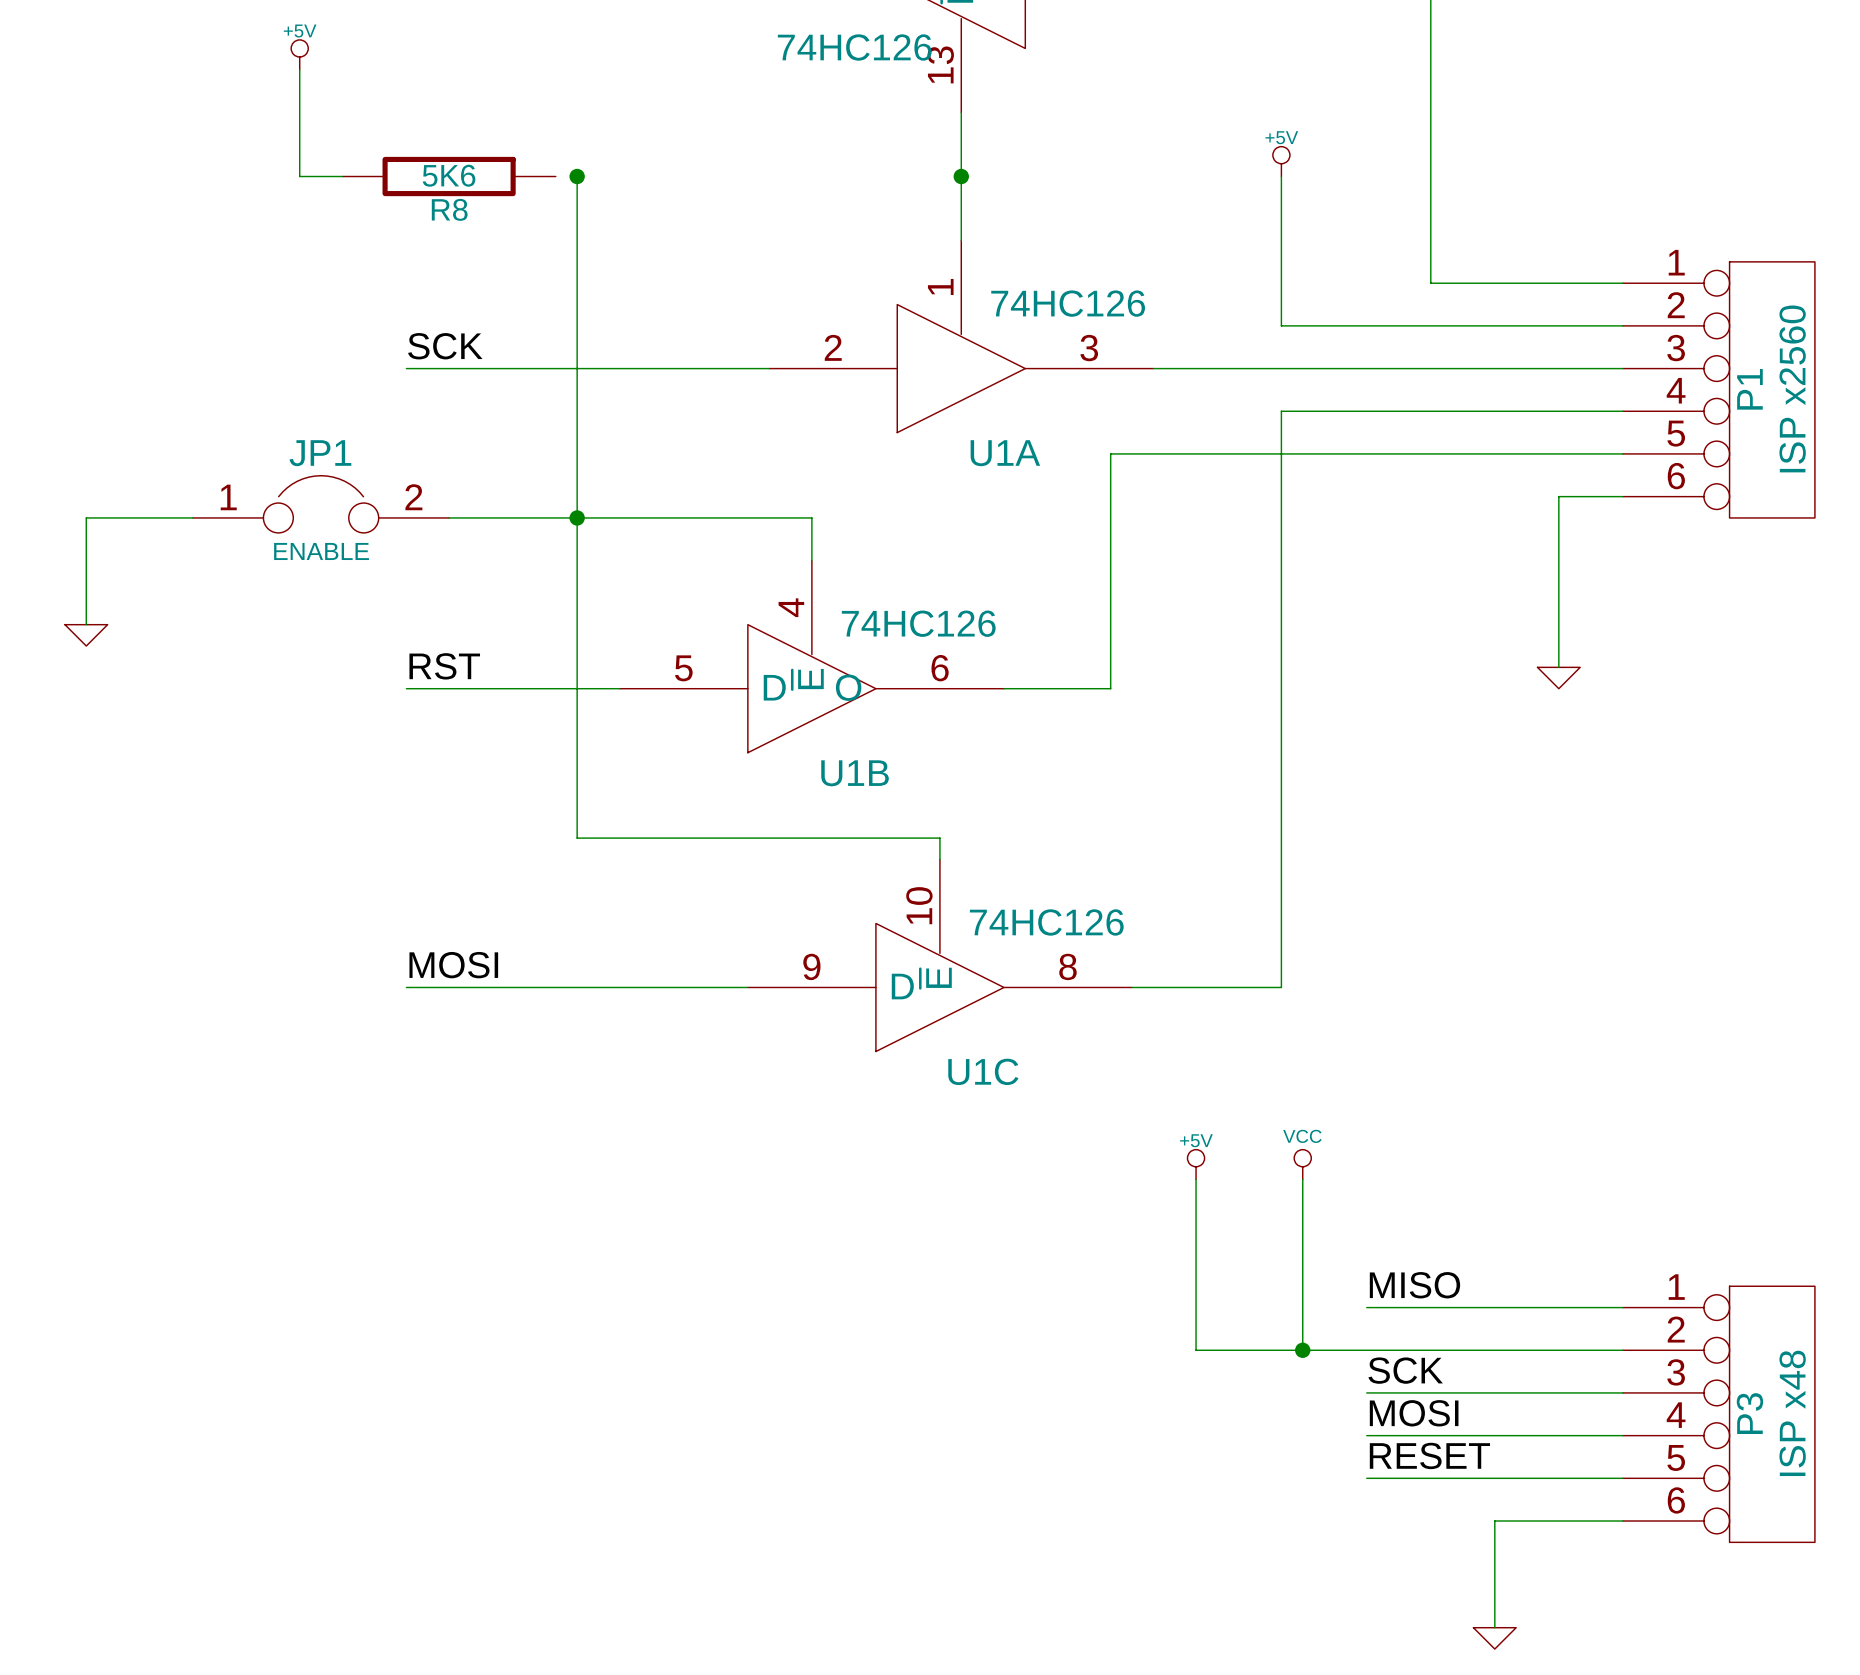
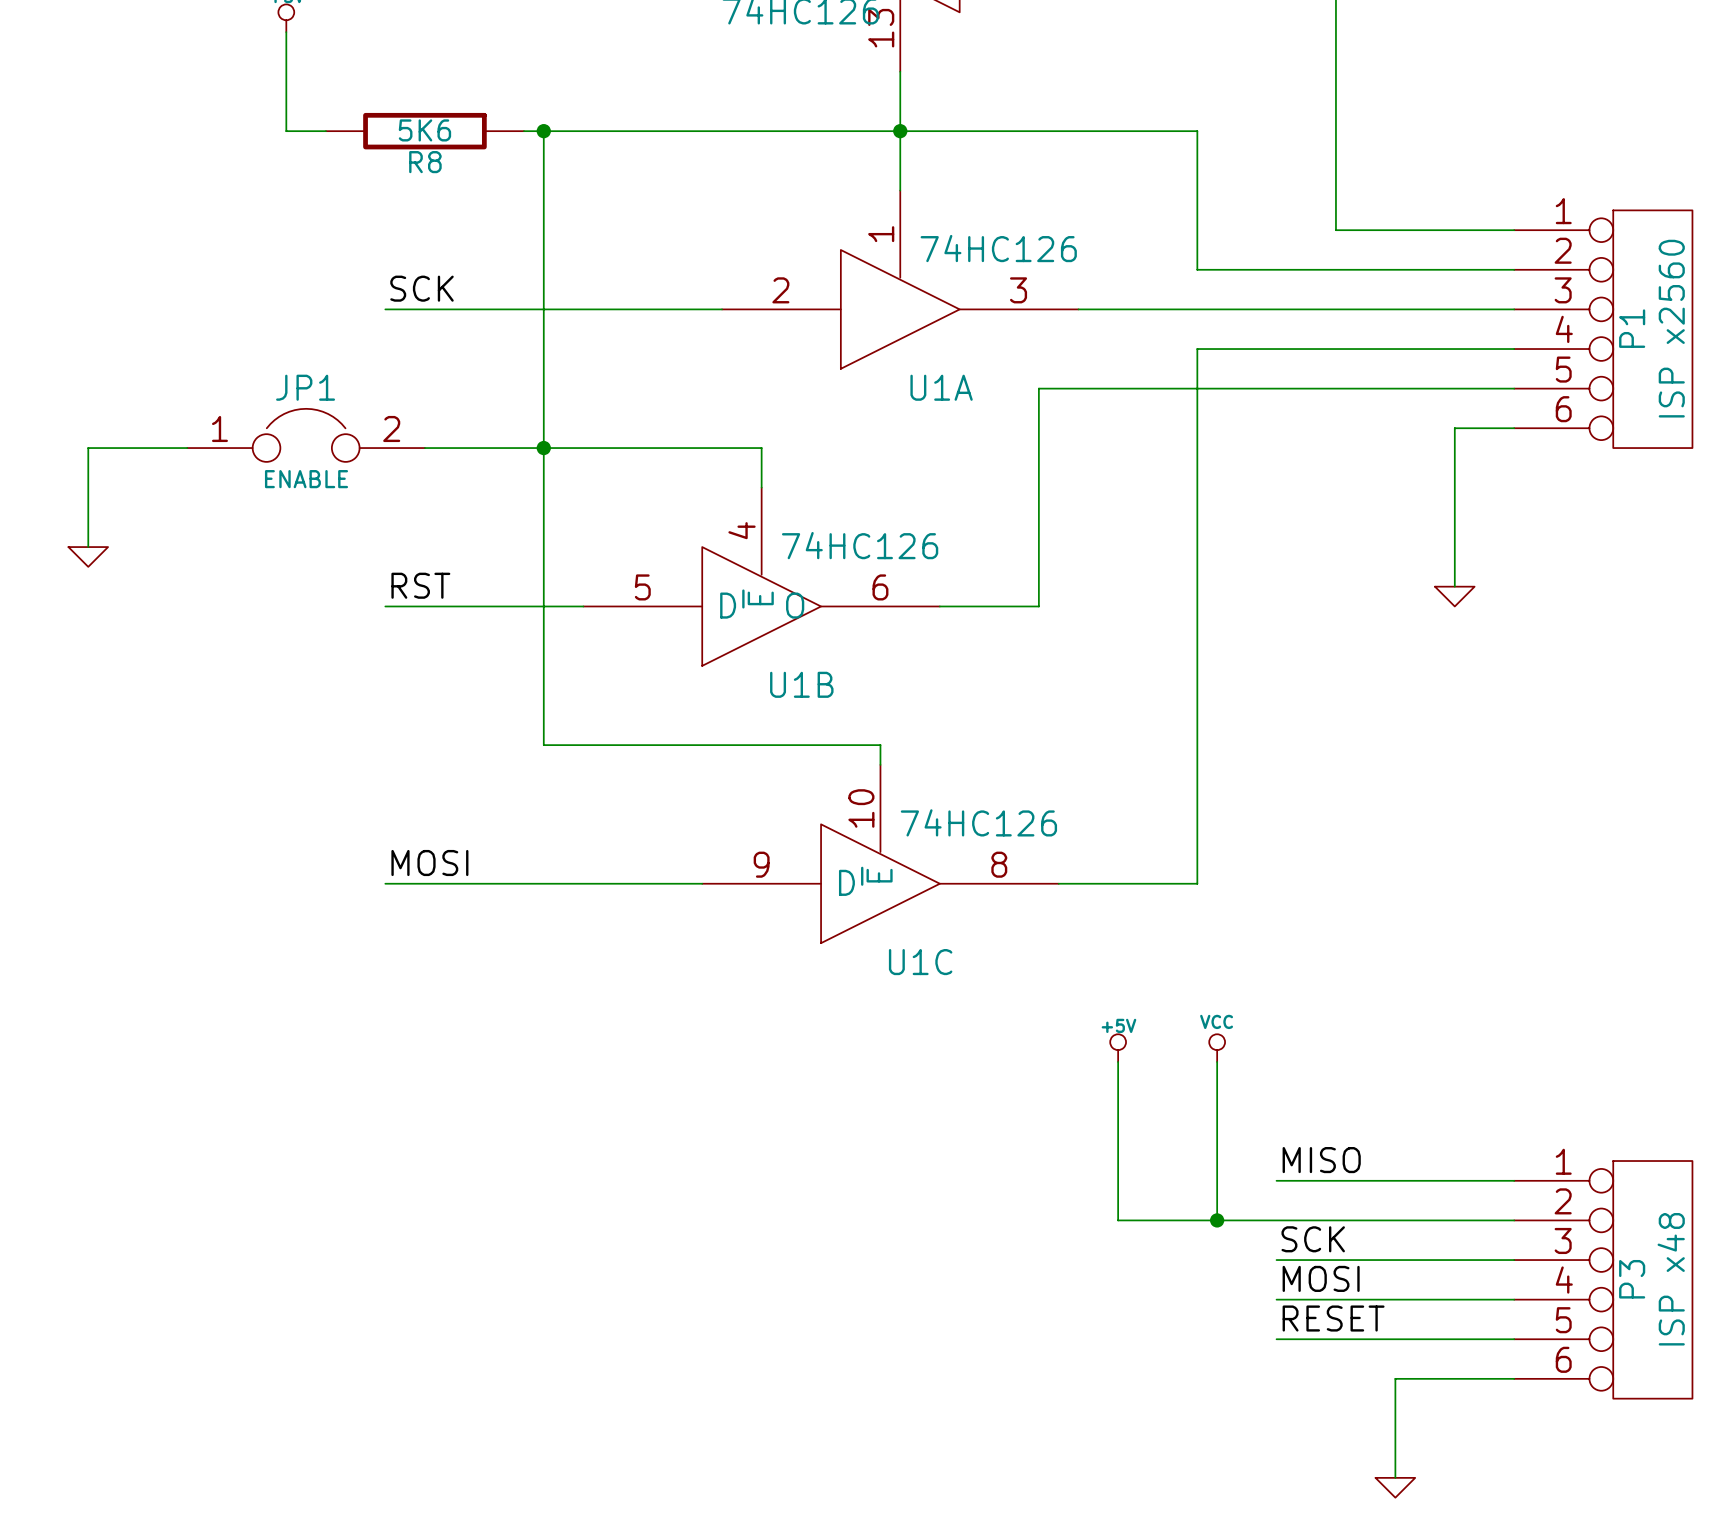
power symbol: +5V (1281, 161) -> none
wire: none -> (523, 131) (1197, 131)

